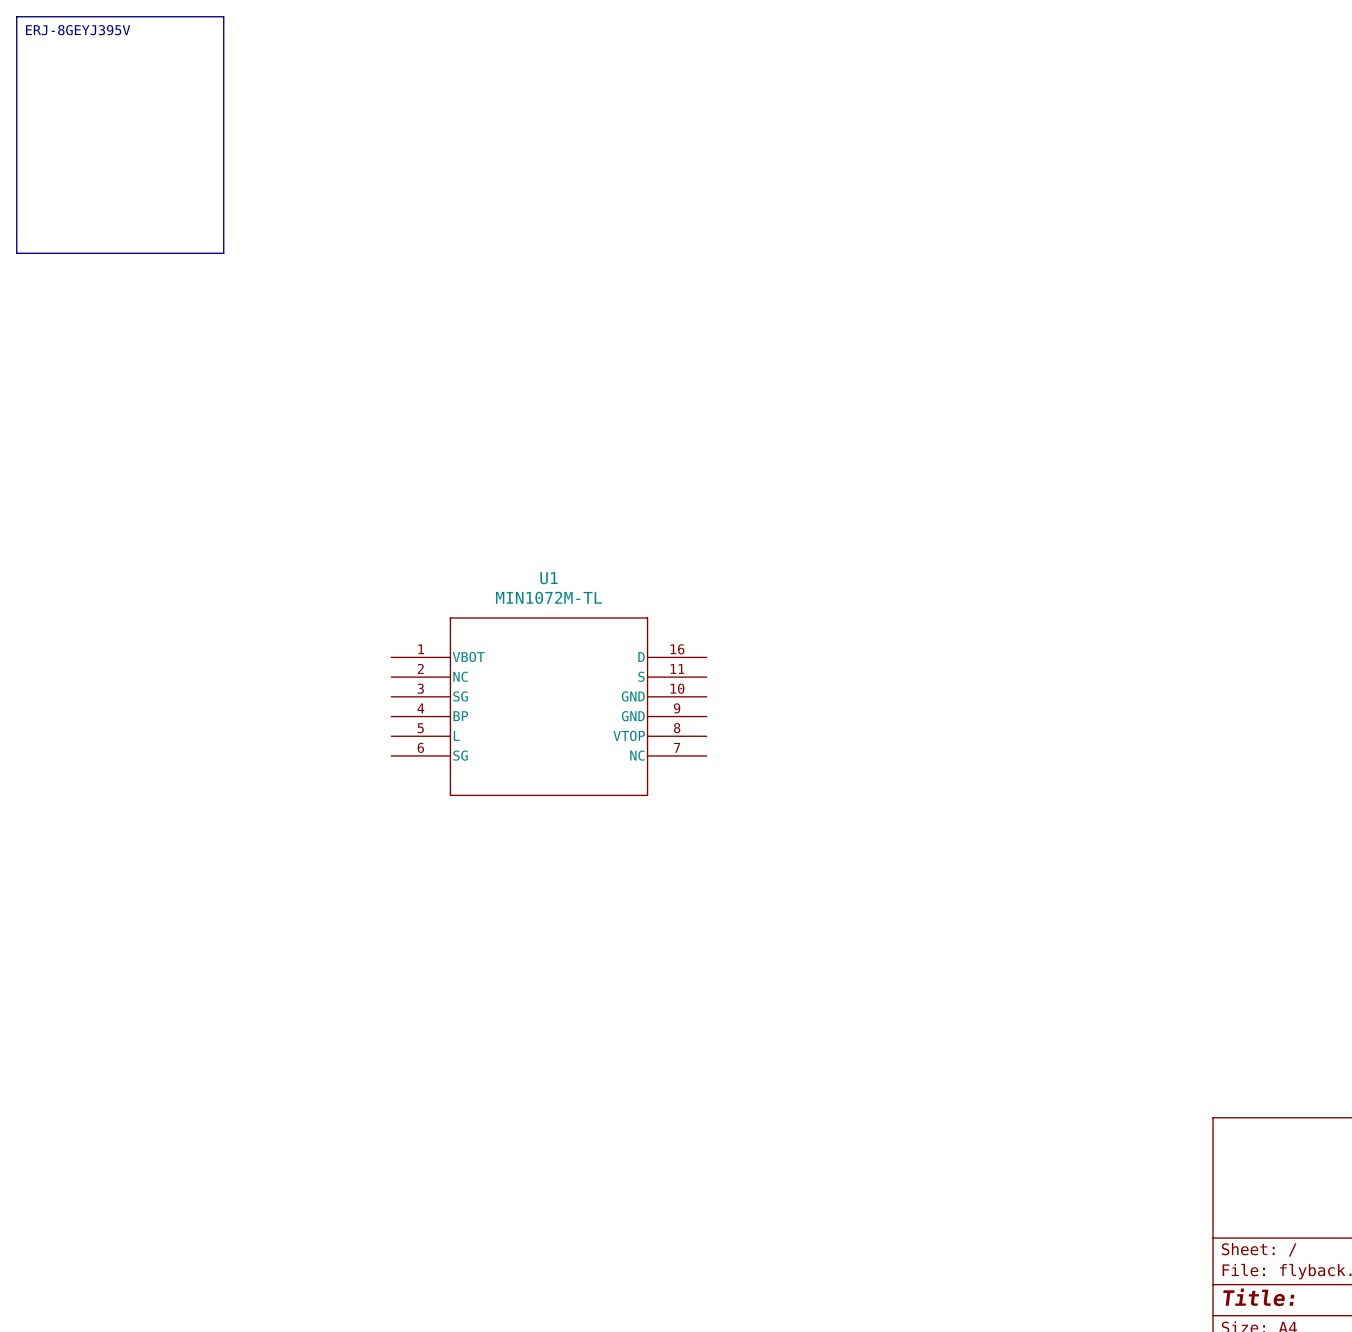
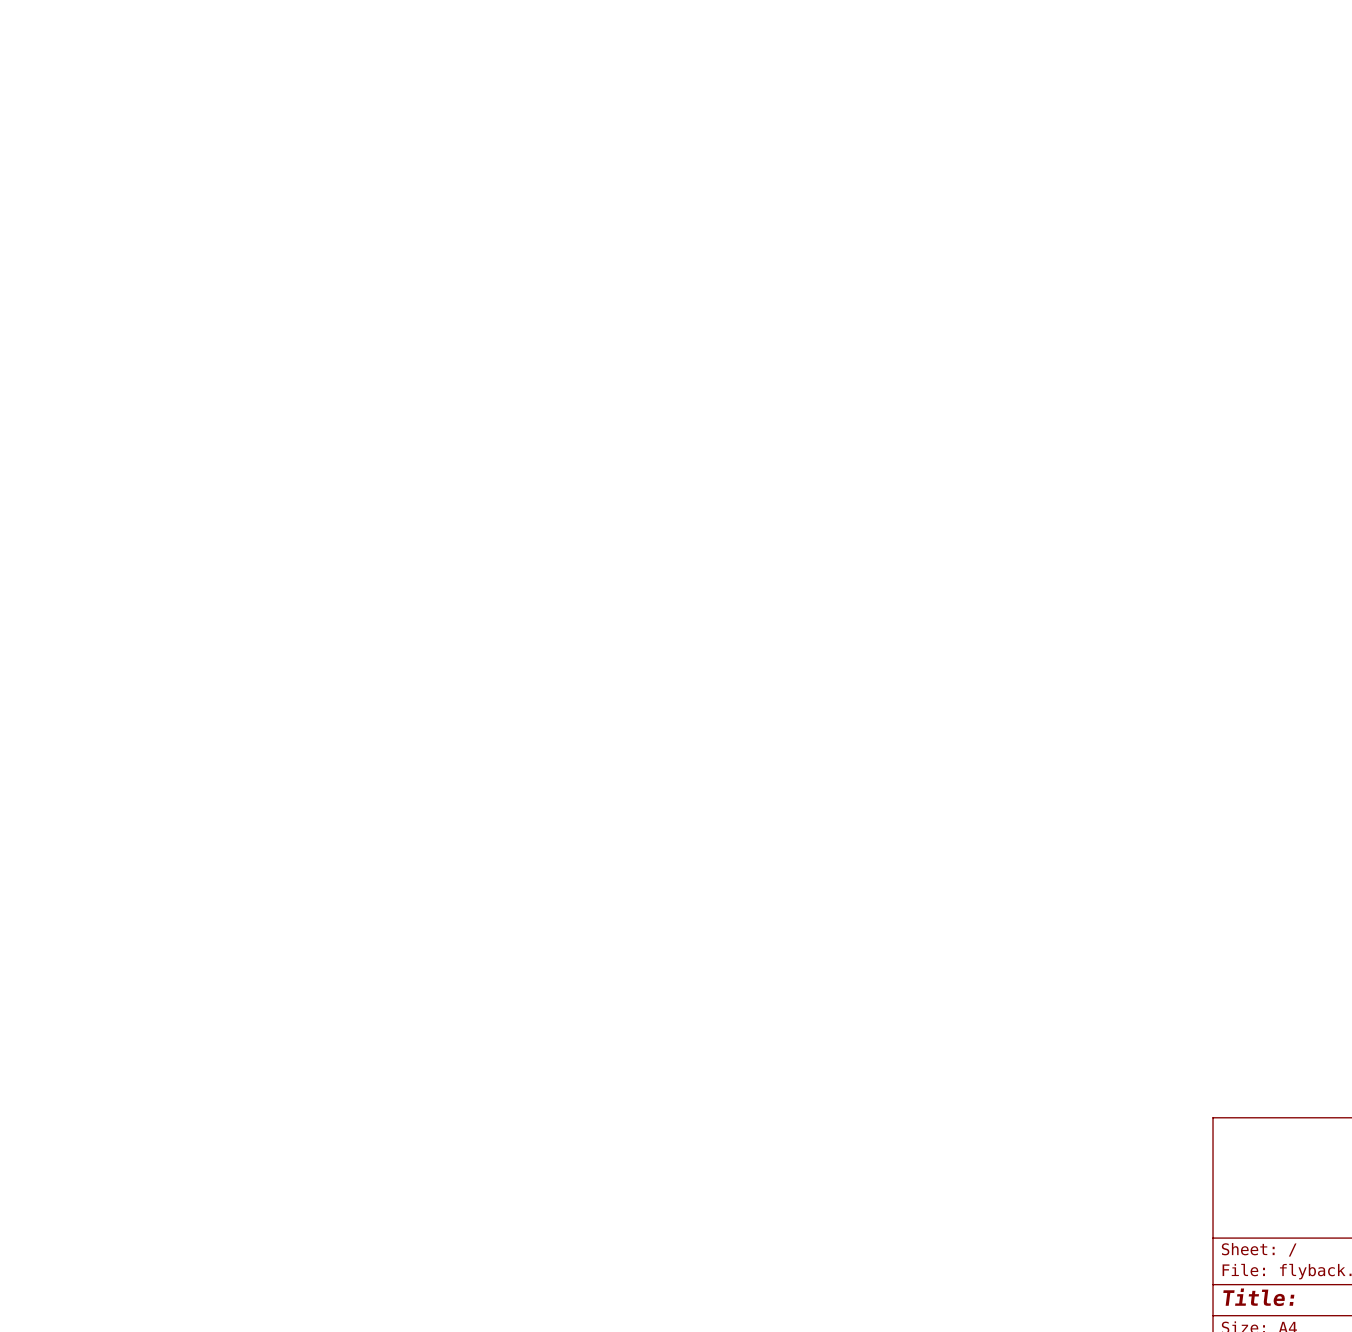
line: (16, 16) (223, 16) (223, 253) (16, 253) (16, 16) -> none
text: ERJ-8GEYJ395V (78, 30) -> none
U1: MIN1072M-TL (548, 706) -> none

